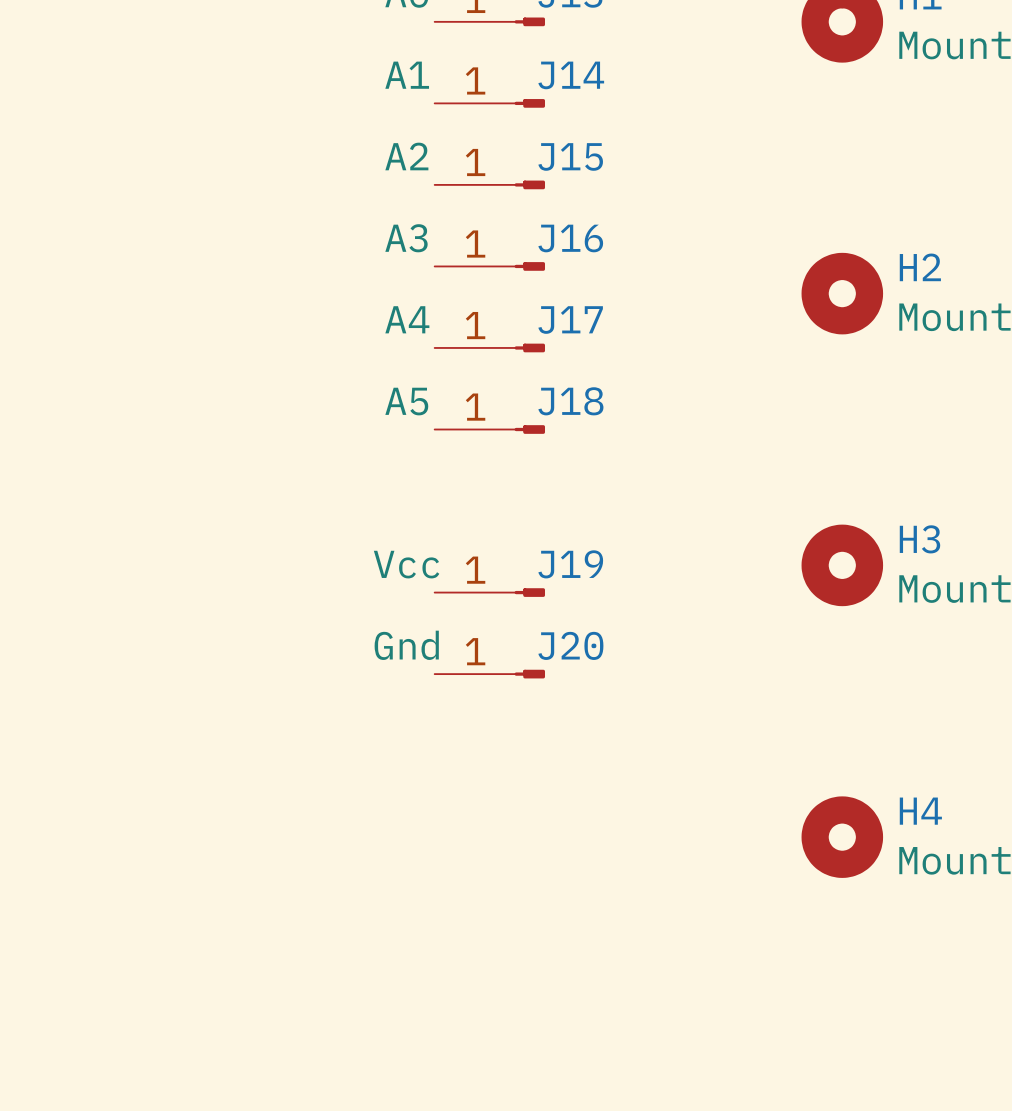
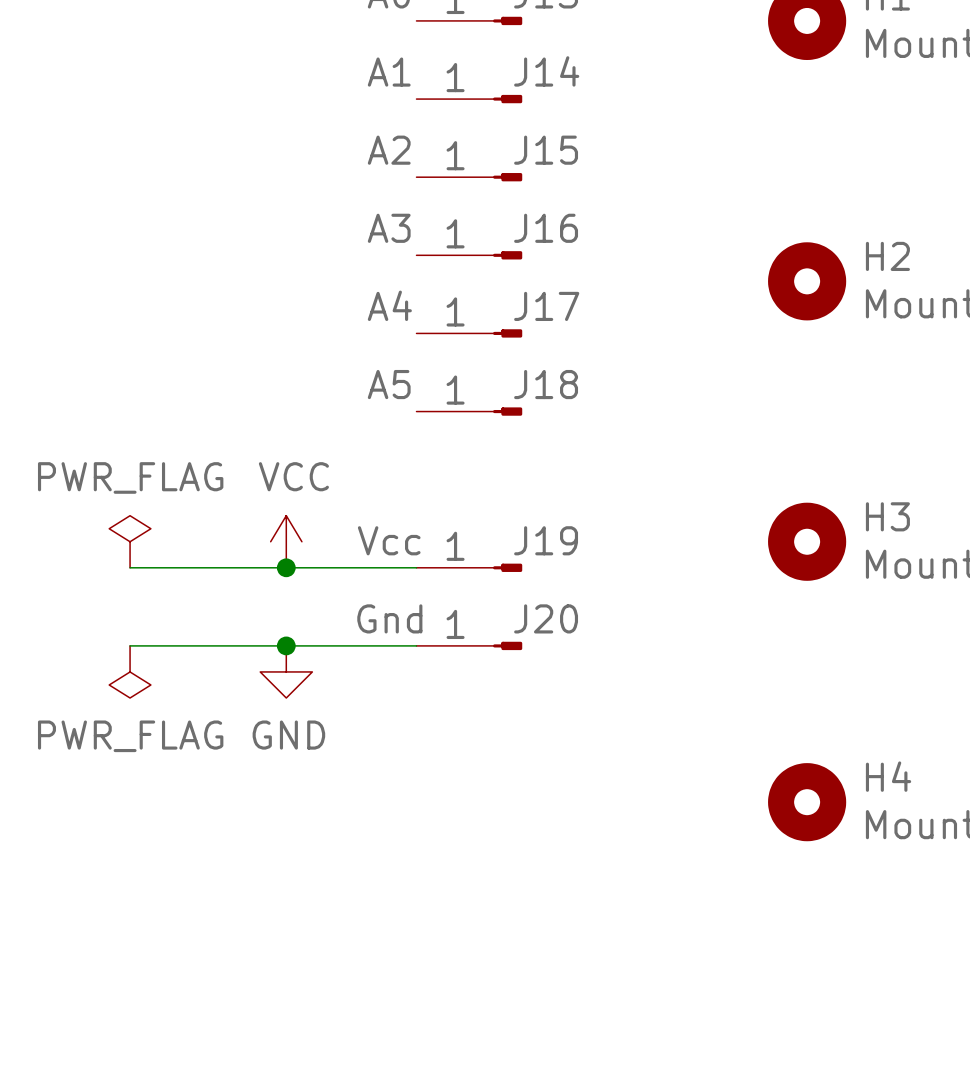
power symbol: none -> PWR_FLAG (130, 541)
power symbol: none -> VCC (286, 541)
wire: none -> (130, 567) (416, 567)
junction: none -> (286, 567)
wire: none -> (130, 645) (416, 645)
junction: none -> (286, 645)
power symbol: none -> PWR_FLAG (130, 671)
power symbol: none -> GND (286, 671)

